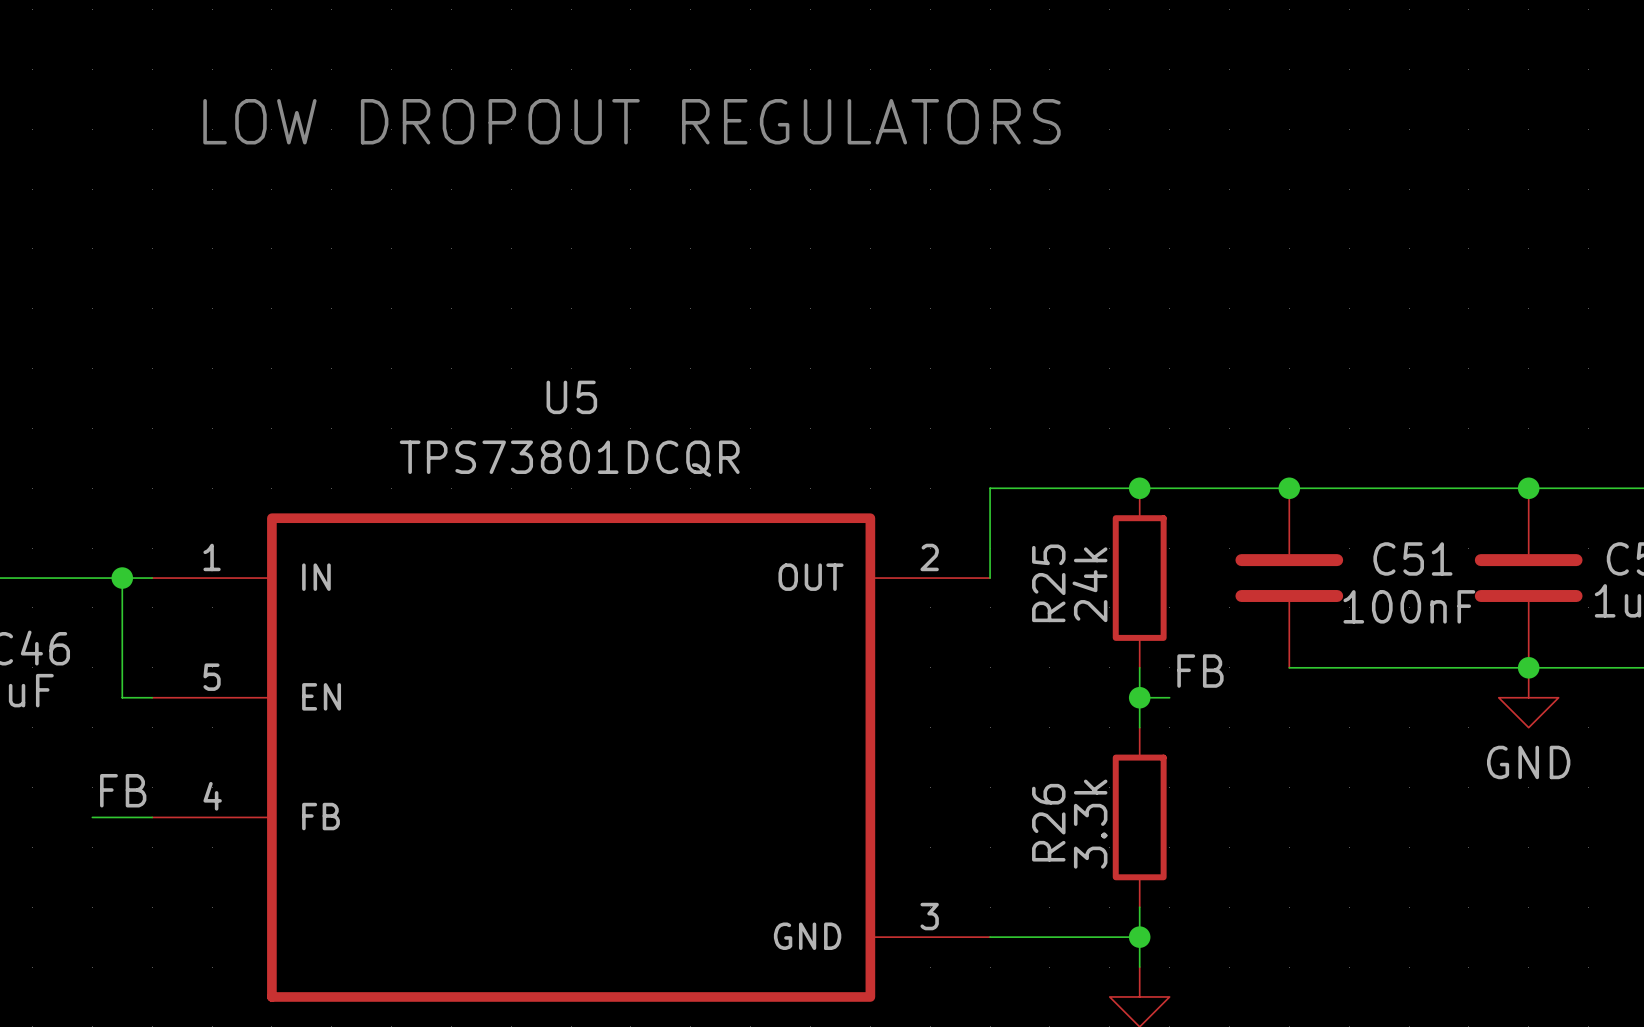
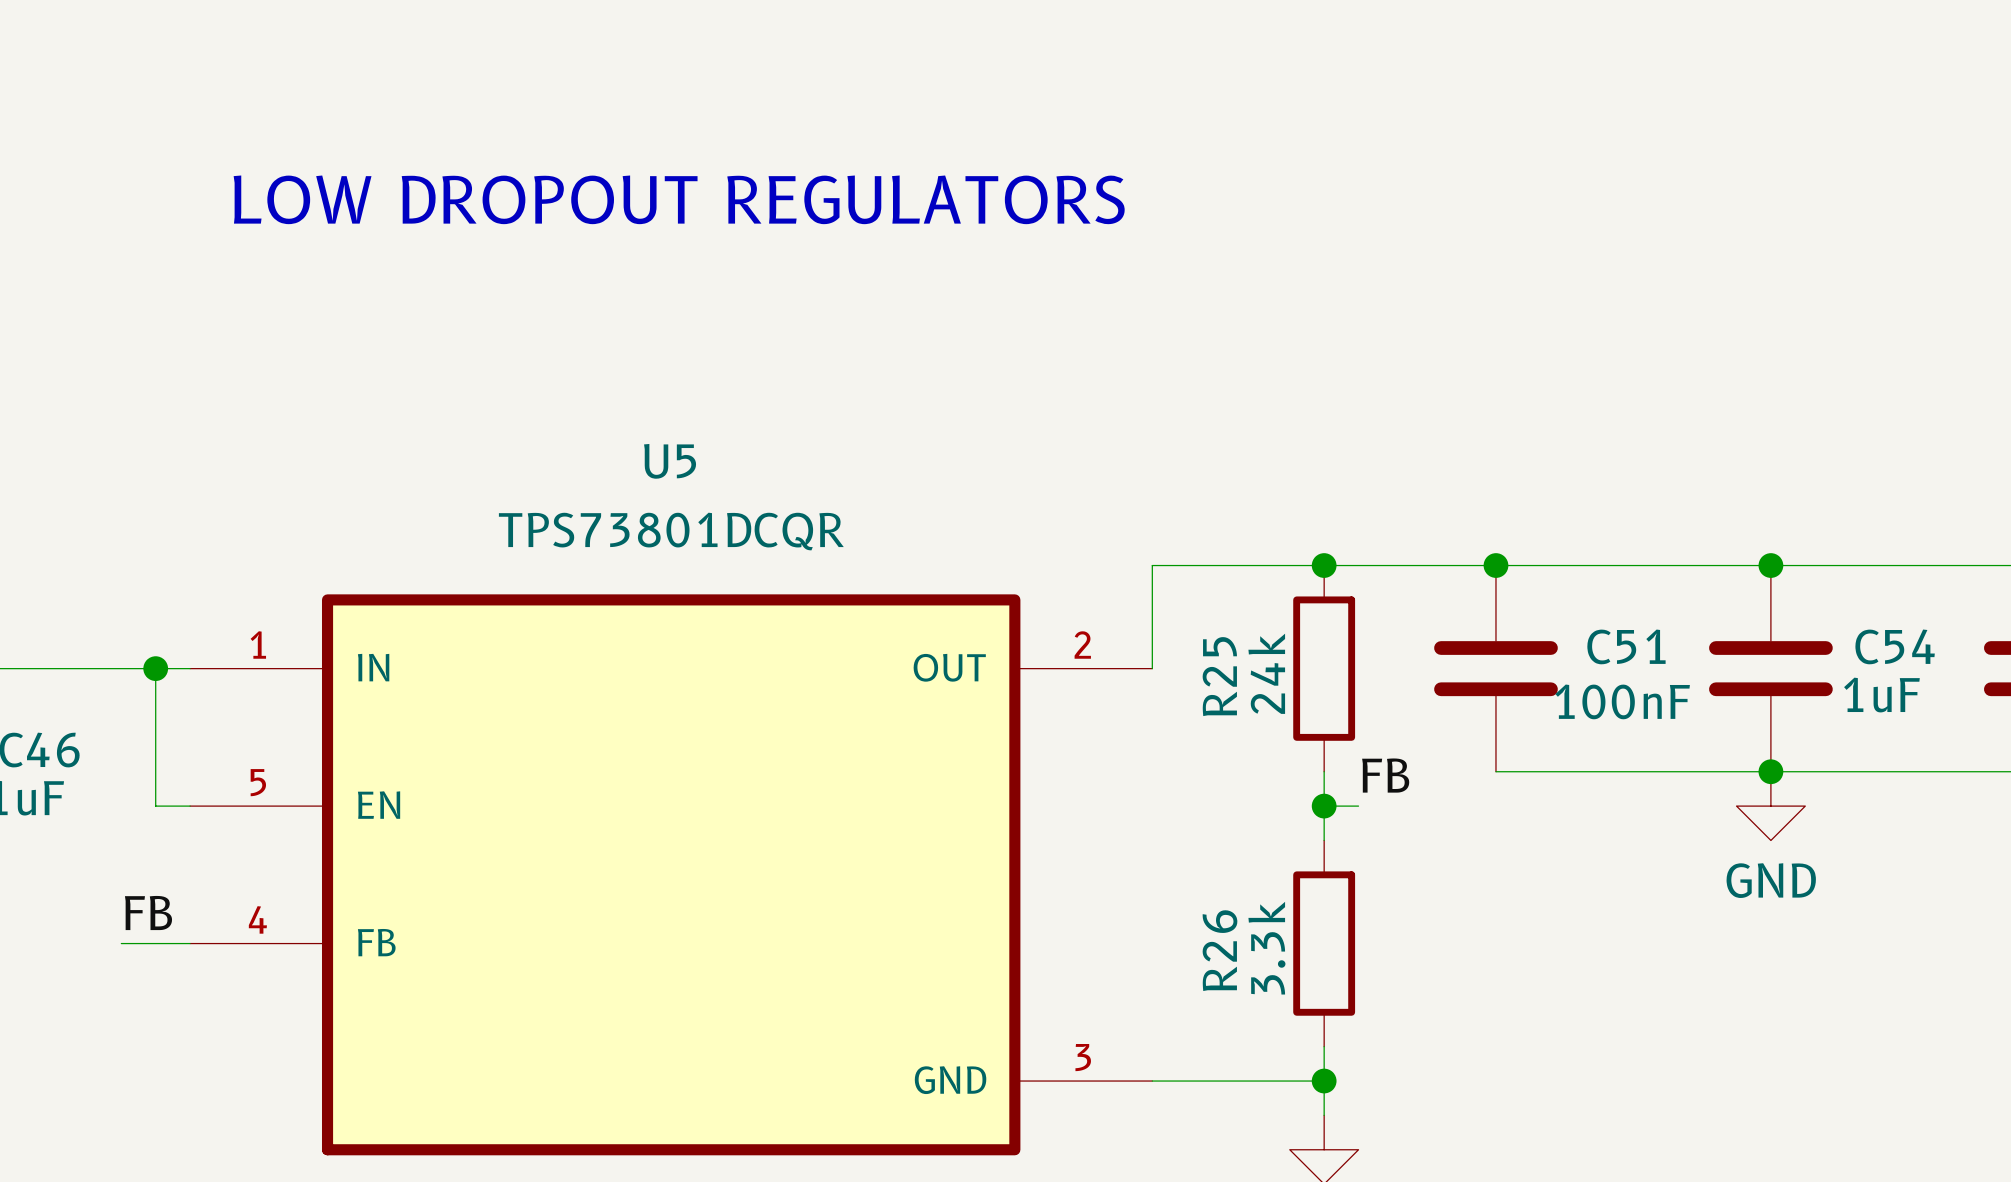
text position: LOW DROPOUT REGULATORS (631, 121) -> LOW DROPOUT REGULATORS (679, 199)

